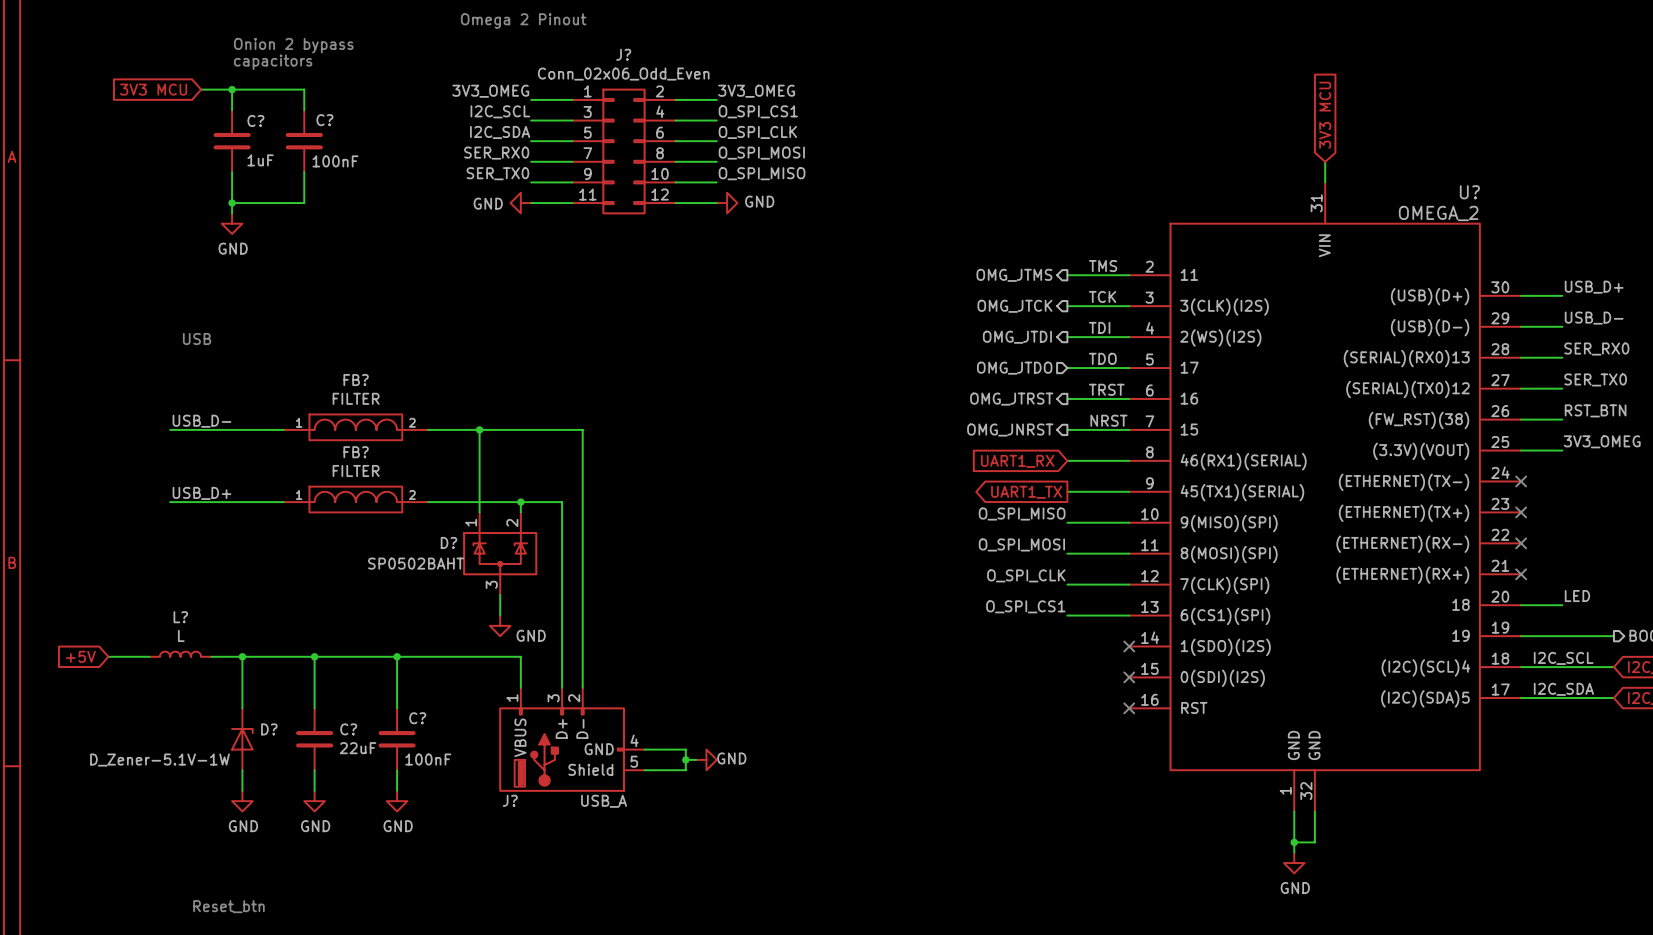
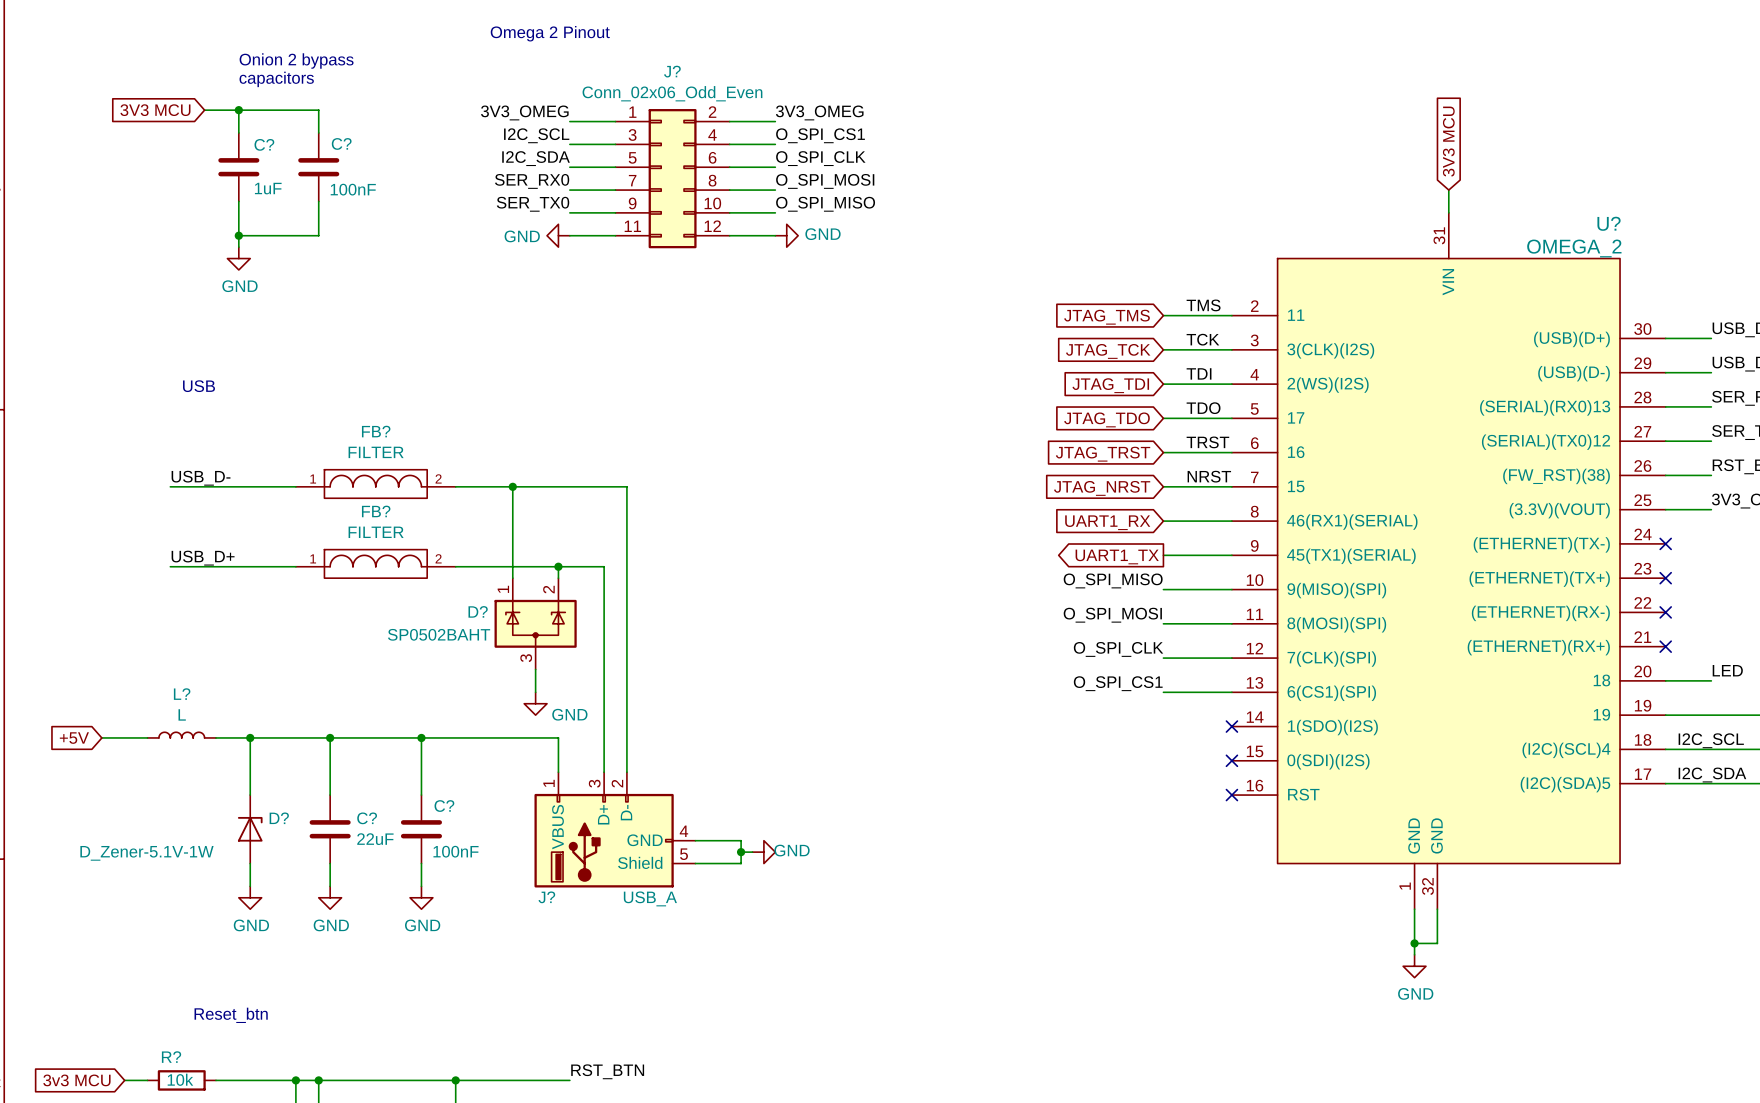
hierarchical label: OMG_JTMS (1014, 275) -> none
global label: none -> JTAG_TMS (1107, 317)
hierarchical label: OMG_JTCK (1014, 306) -> none
global label: none -> JTAG_TCK (1108, 351)
hierarchical label: OMG_JTDI (1017, 337) -> none
global label: none -> JTAG_TDI (1110, 385)
hierarchical label: OMG_JTDO (1014, 368) -> none
global label: none -> JTAG_TDO (1106, 419)
hierarchical label: OMG_JTRST (1011, 399) -> none
global label: none -> JTAG_TRST (1103, 454)
hierarchical label: OMG_JNRST (1010, 430) -> none
global label: none -> JTAG_NRST (1102, 488)

